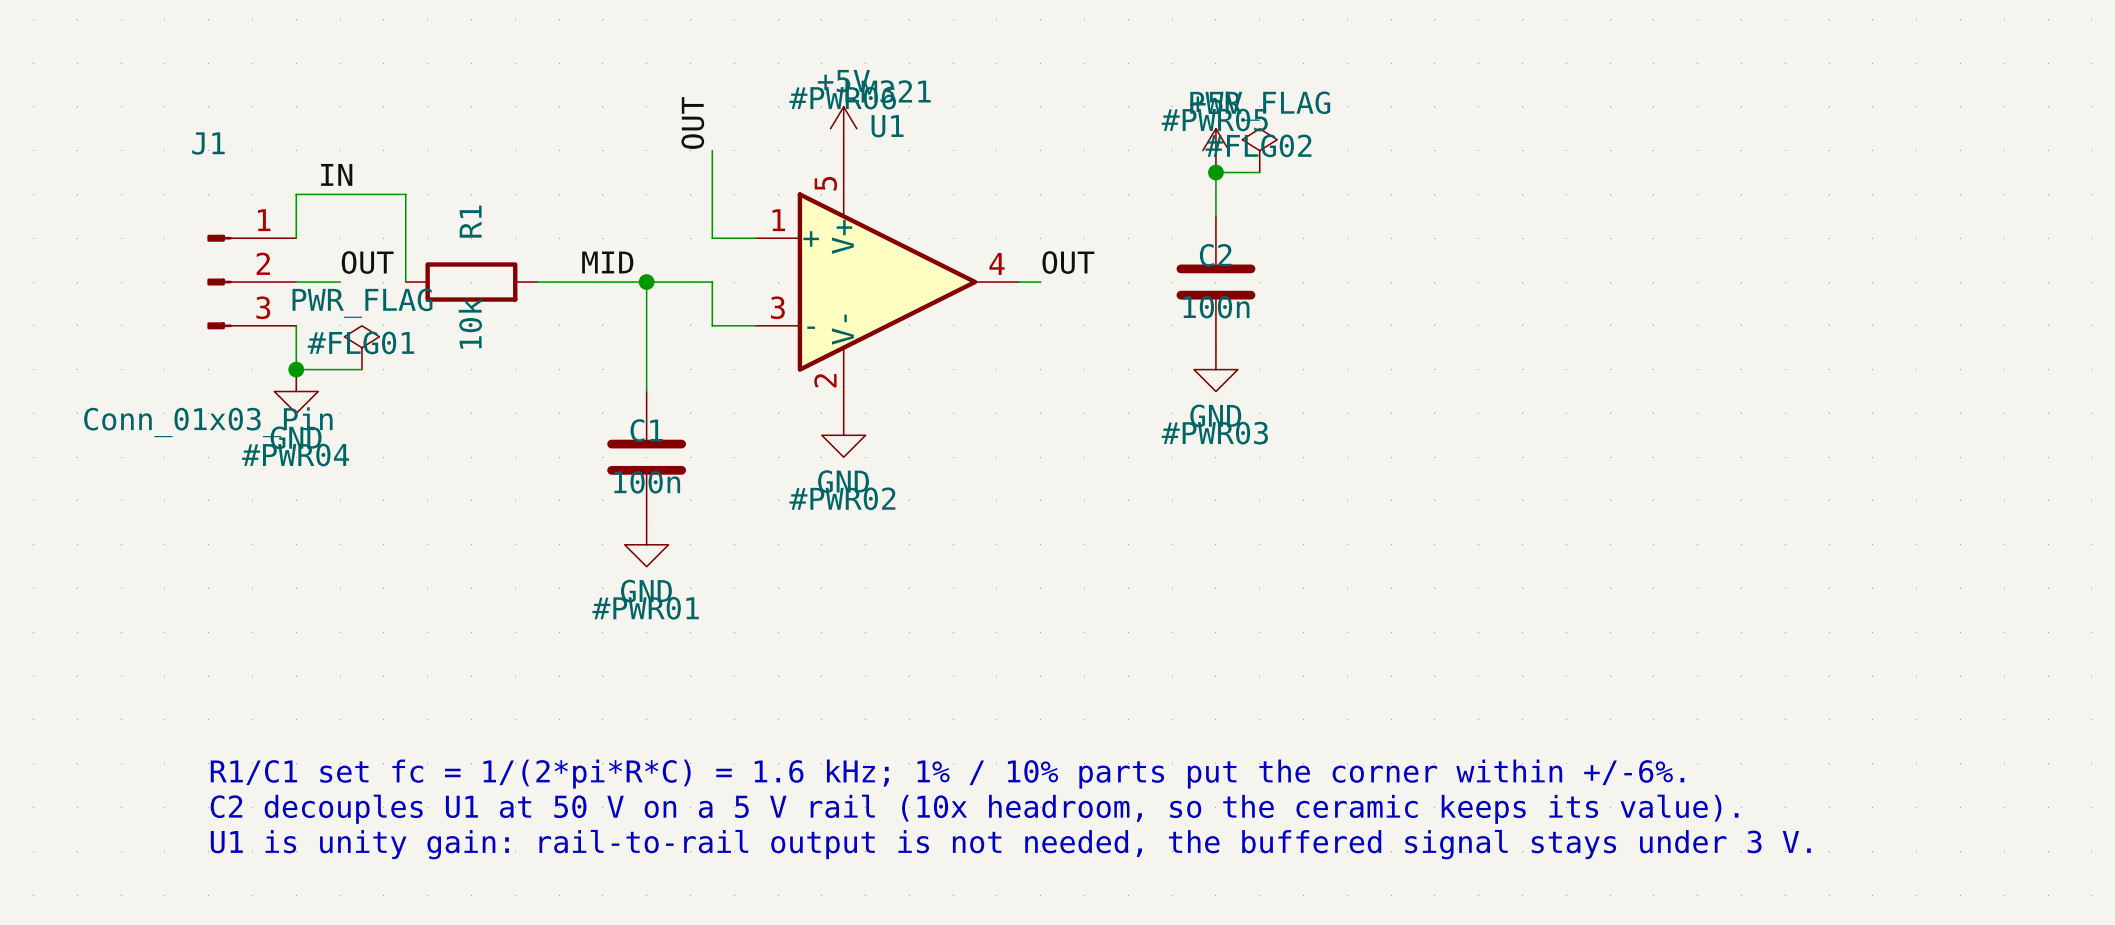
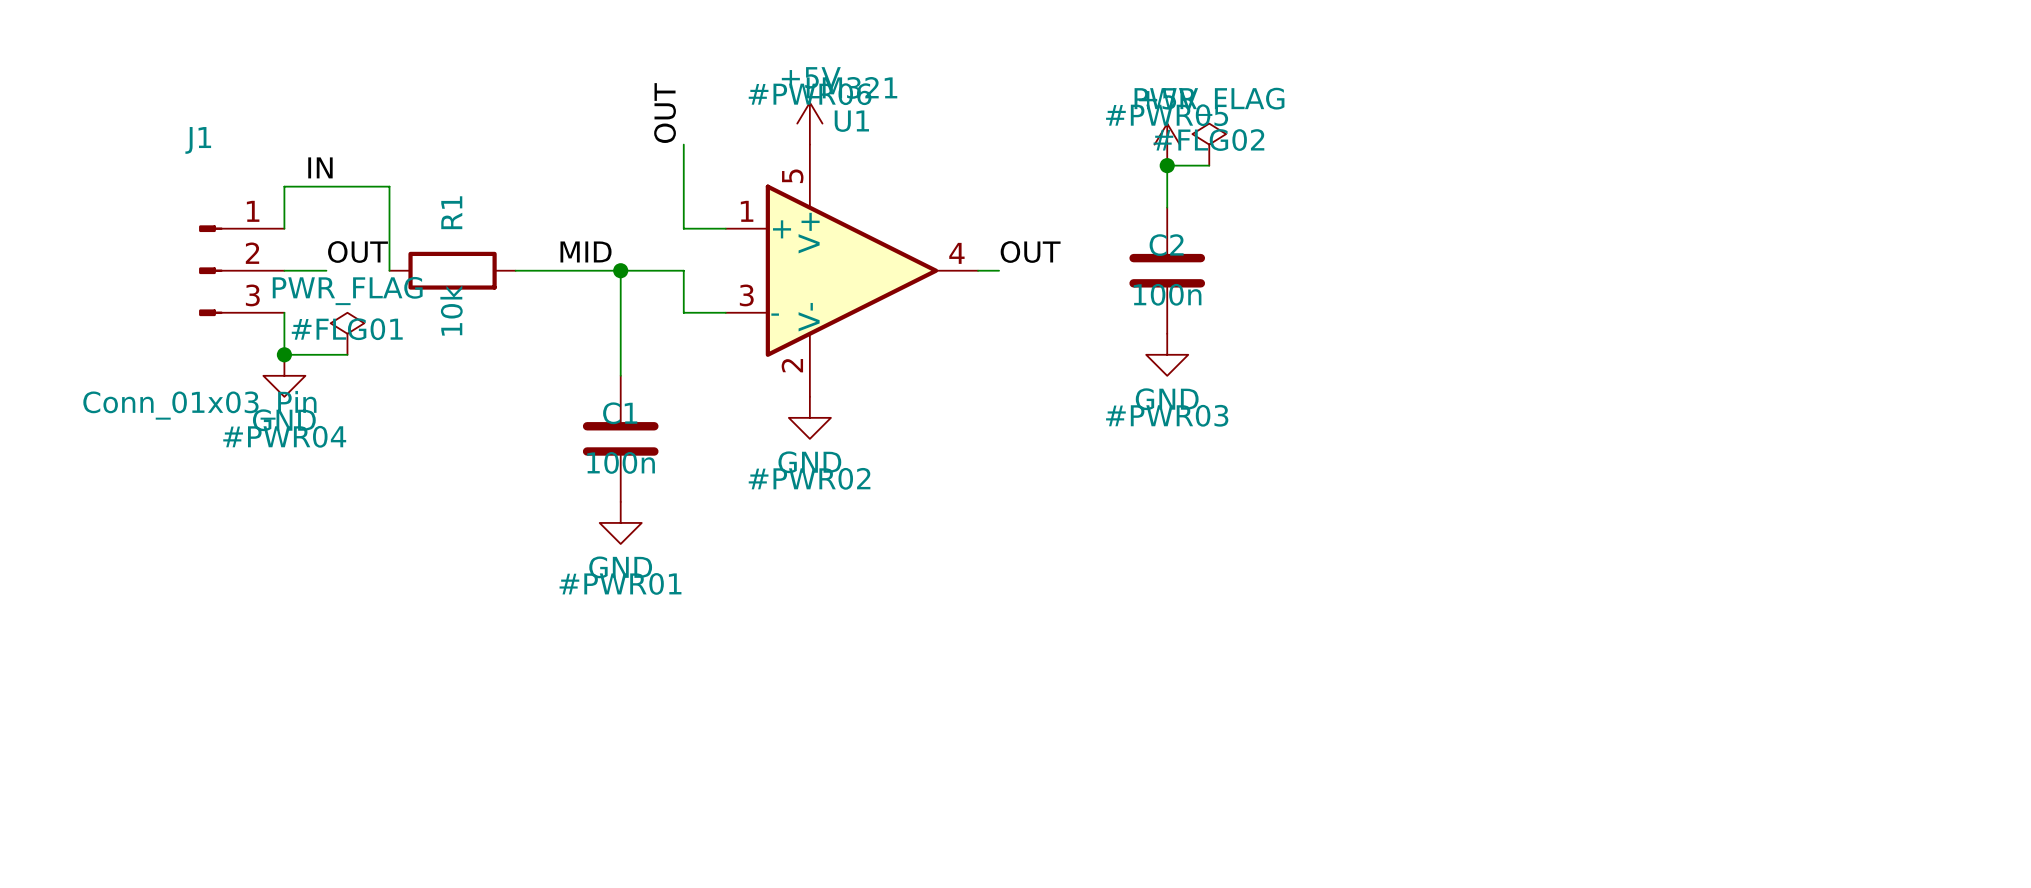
text: R1/C1 set fc = 1/(2*pi*R*C) = 1.6 kHz; 1% / 10% parts put the corner within +/-6%. (947, 774) -> none
text: C2 decouples U1 at 50 V on a 5 V rail (10x headroom, so the ceramic keeps its value). (974, 809) -> none
text: U1 is unity gain: rail-to-rail output is not needed, the buffered signal stays under 3 V. (1010, 844) -> none

